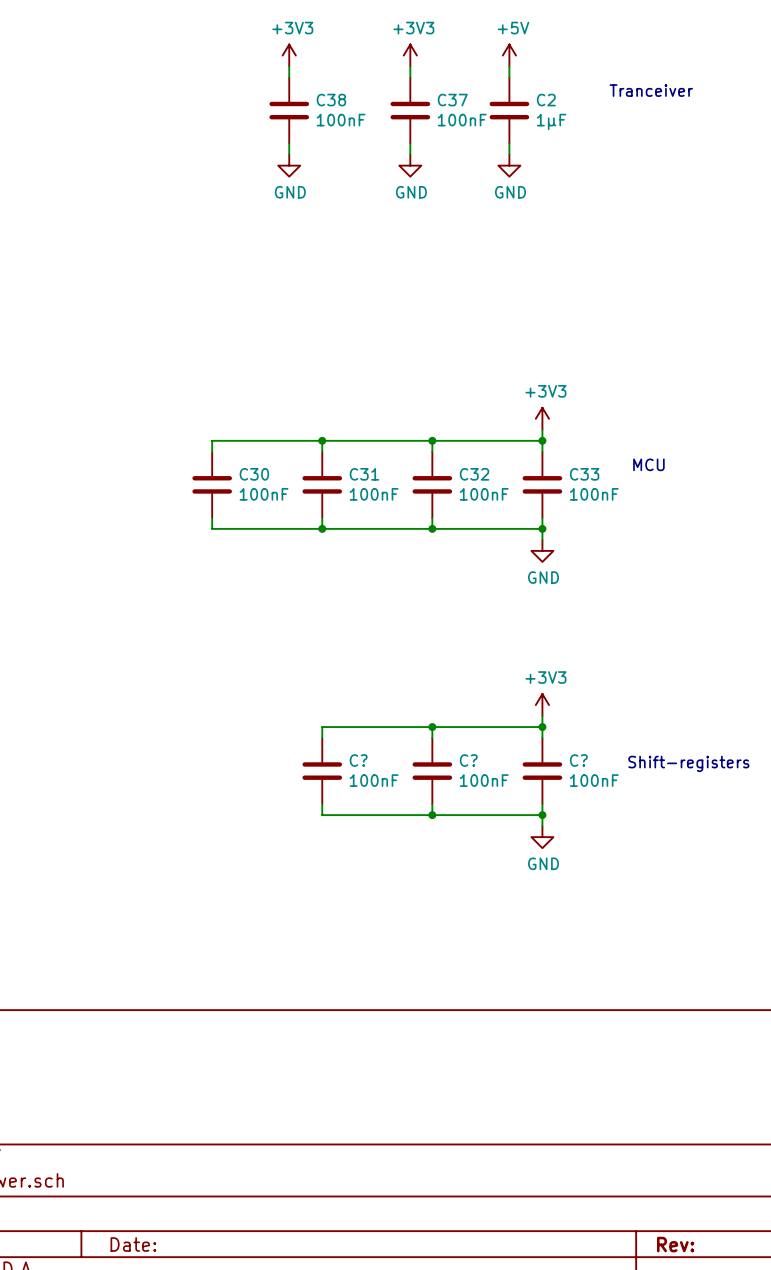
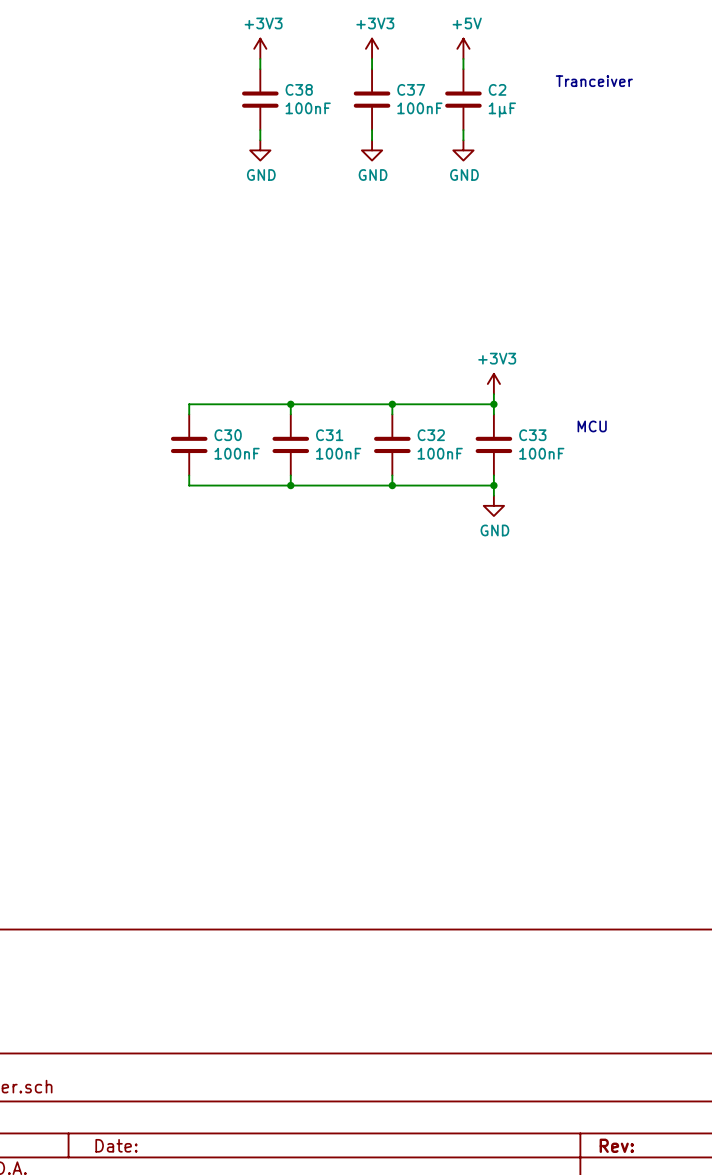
power symbol: +3V3 (542, 705) -> none
wire: (542, 716) (542, 738) -> none
wire: (432, 727) (432, 738) -> none
junction: (432, 727) -> none
wire: (542, 727) (322, 727) (322, 738) -> none
junction: (542, 727) -> none
text: Shift-registers (688, 763) -> none
C?: 100nF (322, 771) -> none
C?: 100nF (432, 771) -> none
C?: 100nF (542, 771) -> none
wire: (322, 804) (322, 815) (542, 815) -> none
wire: (432, 804) (432, 815) -> none
wire: (542, 804) (542, 826) -> none
junction: (432, 815) -> none
junction: (542, 815) -> none
power symbol: GND (542, 837) -> none

